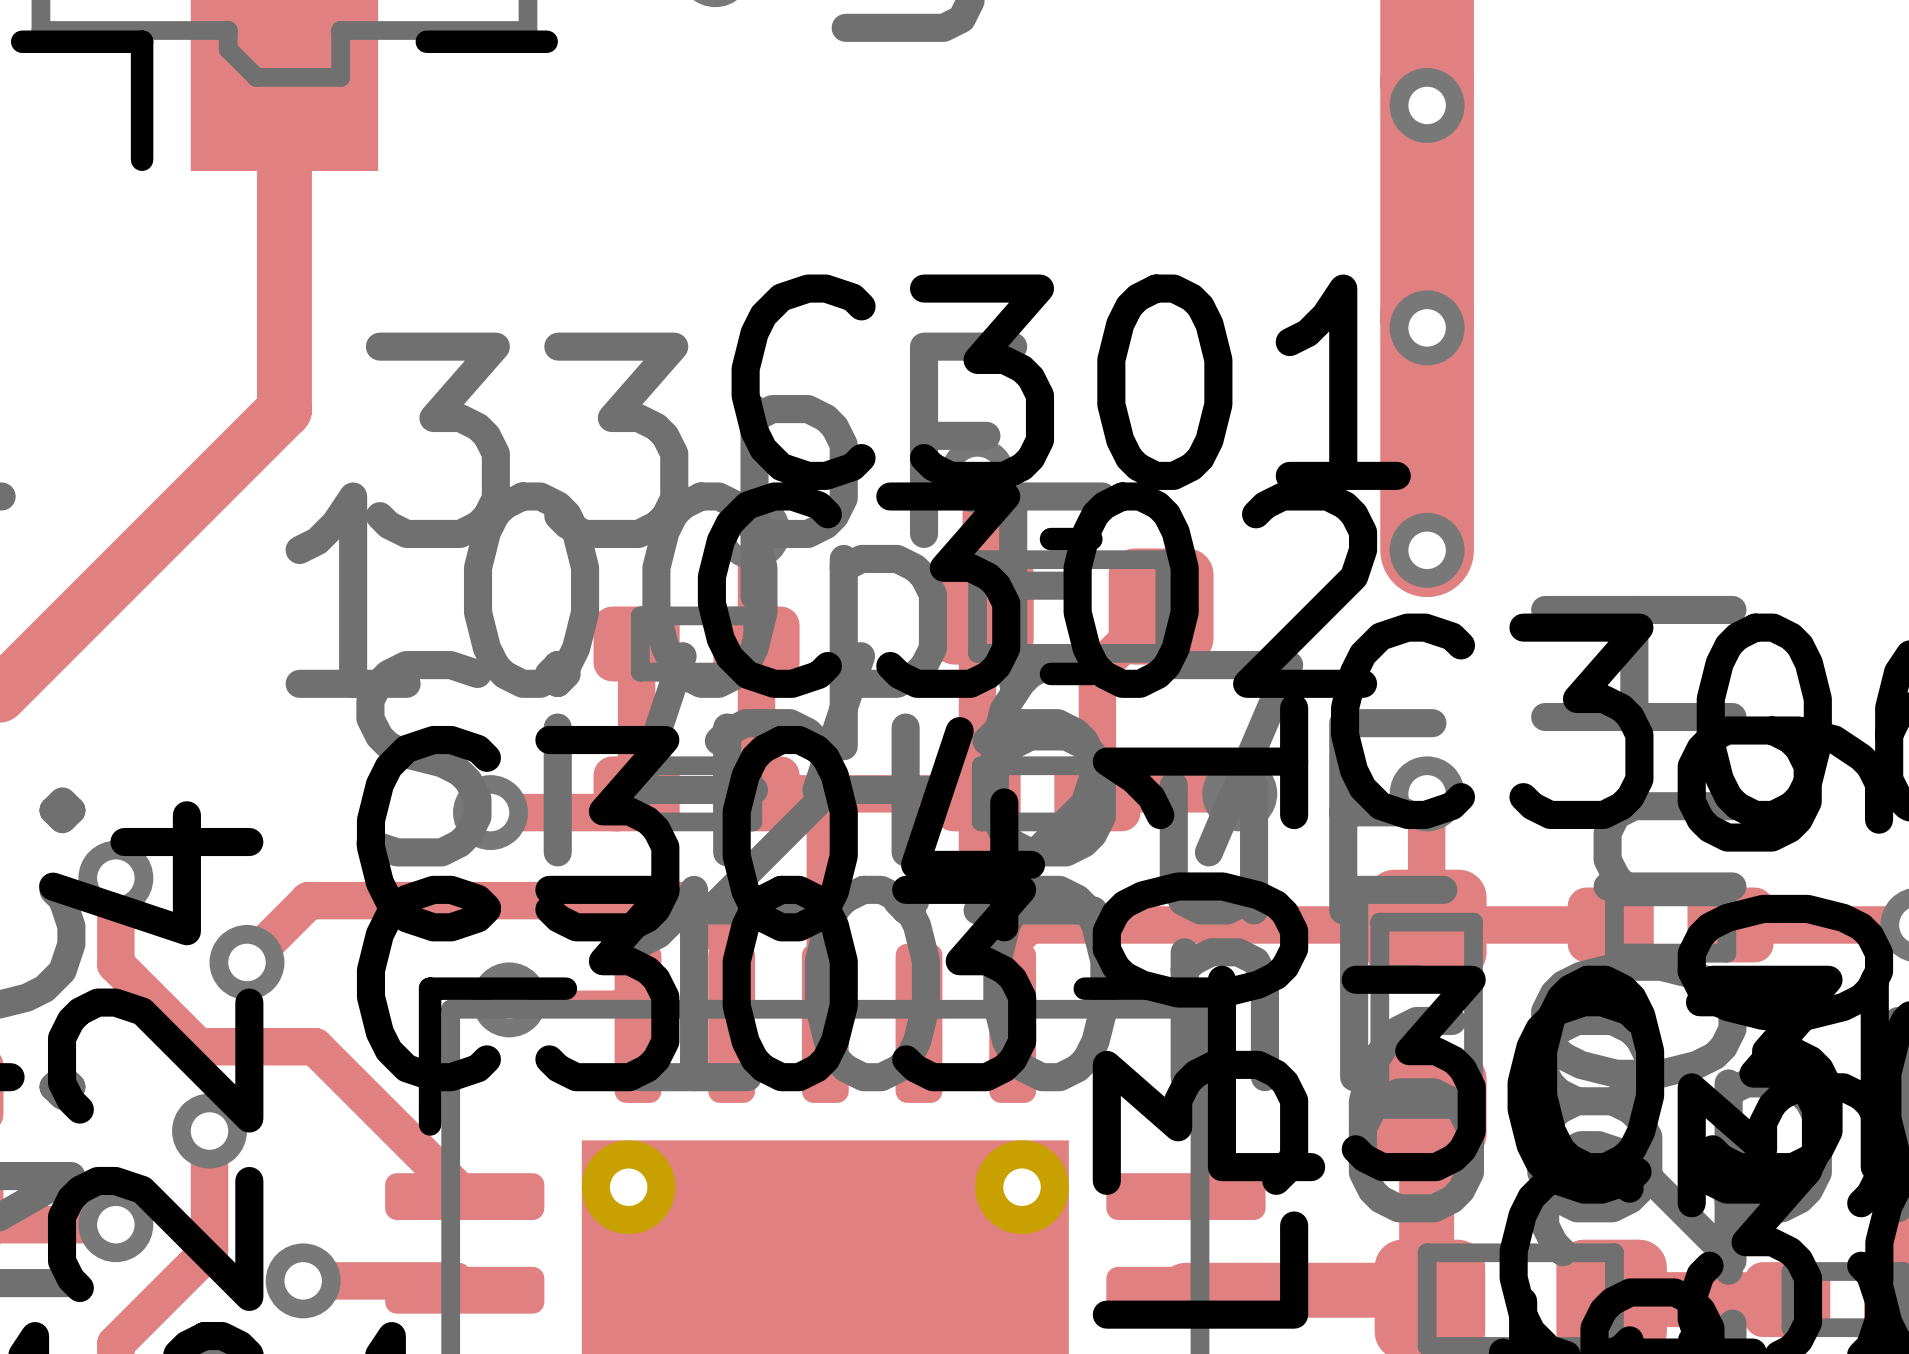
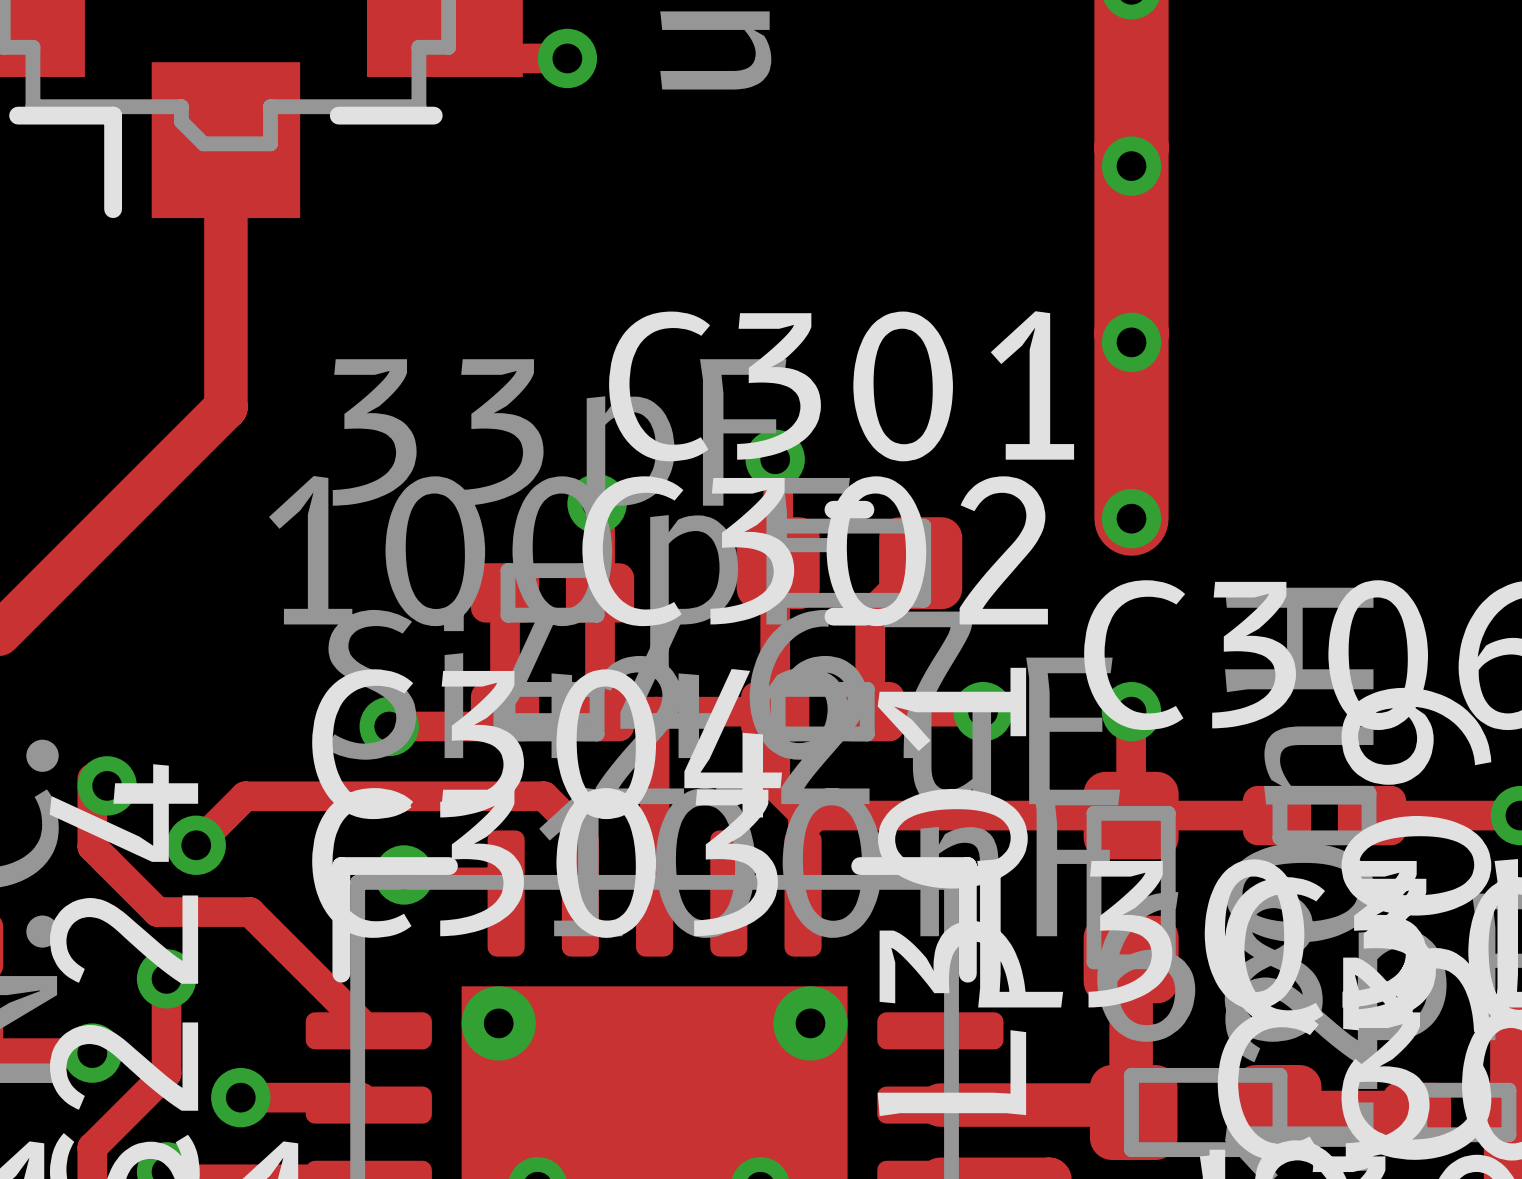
via position: (115, 878) -> (107, 785)

